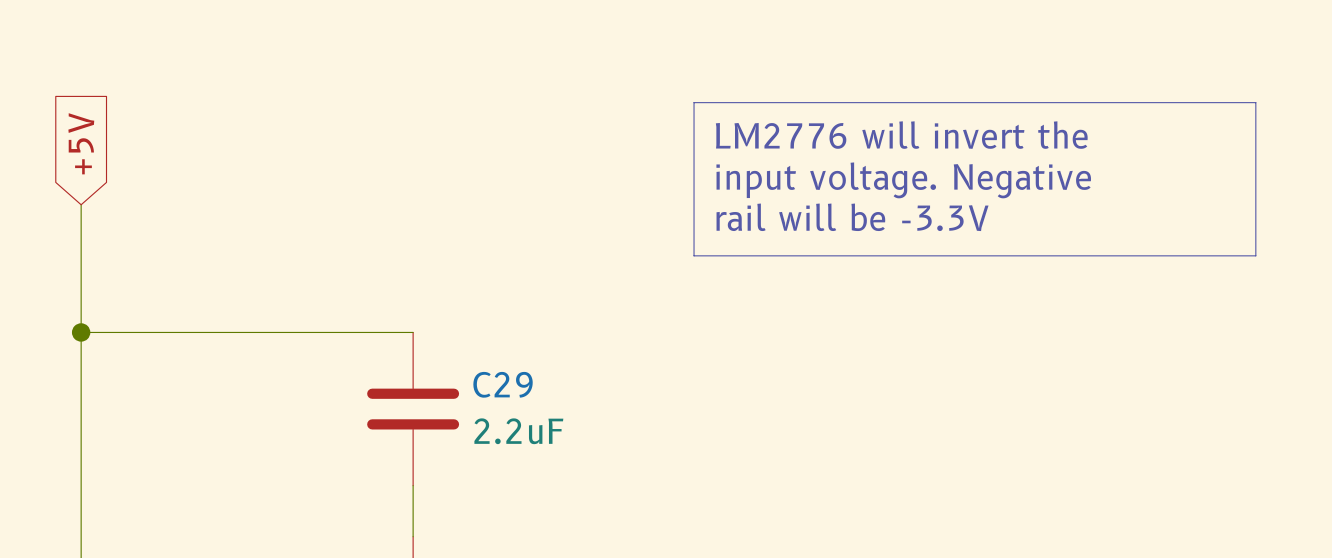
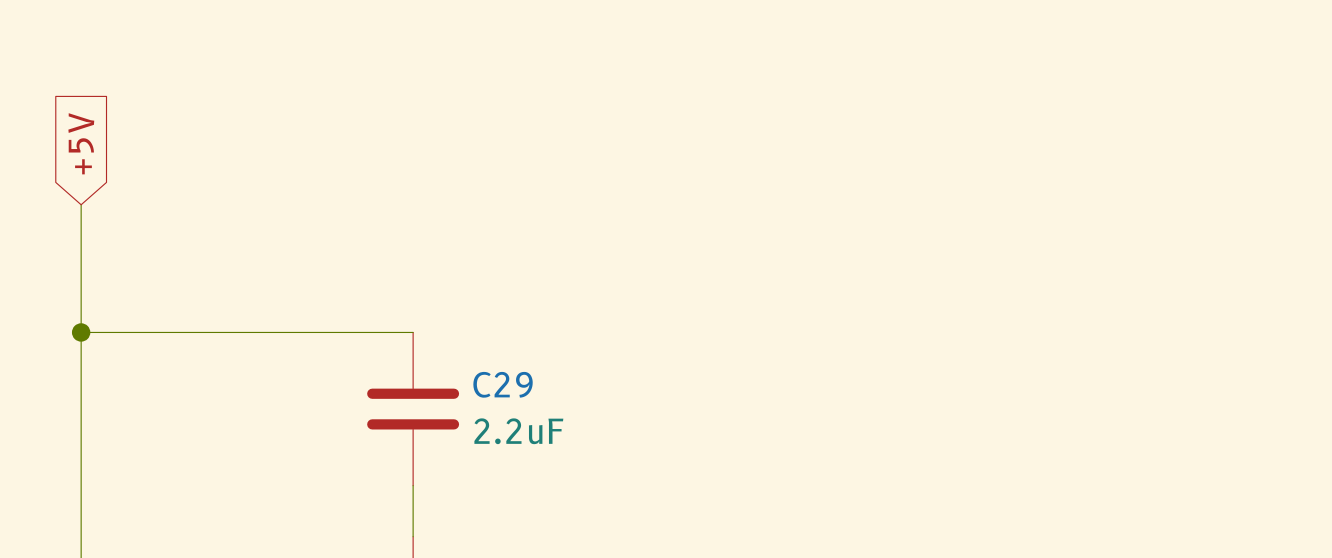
line: (694, 102) (1255, 102) (1255, 255) (694, 255) (694, 102) -> none
text: LM2776 will invert the (901, 135) -> none
text: input voltage. Negative (903, 180) -> none
text: rail will be -3.3V (852, 217) -> none

